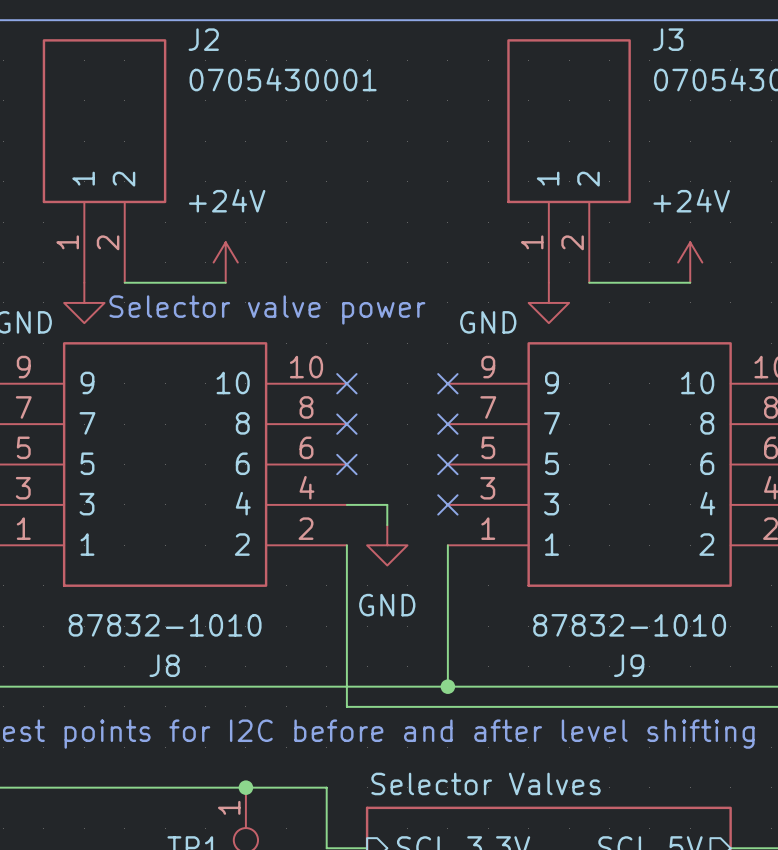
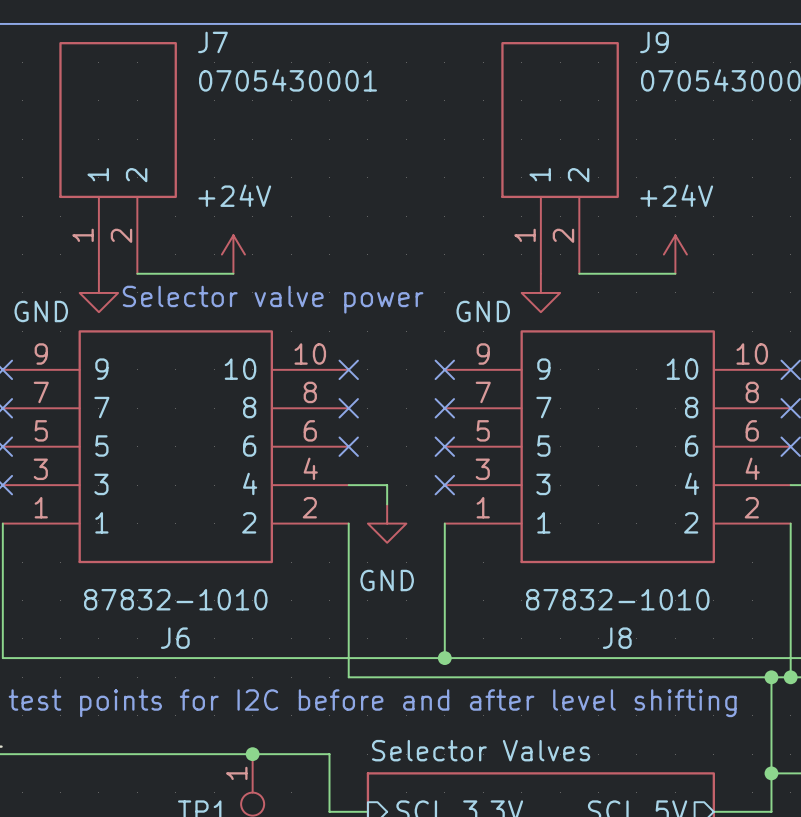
J2 name: J2 (203, 39) -> J7 (212, 42)
J3 name: J3 (668, 39) -> J9 (654, 42)
J8 name: J8 (164, 665) -> J6 (175, 638)
J9 name: J9 (629, 665) -> J8 (617, 638)

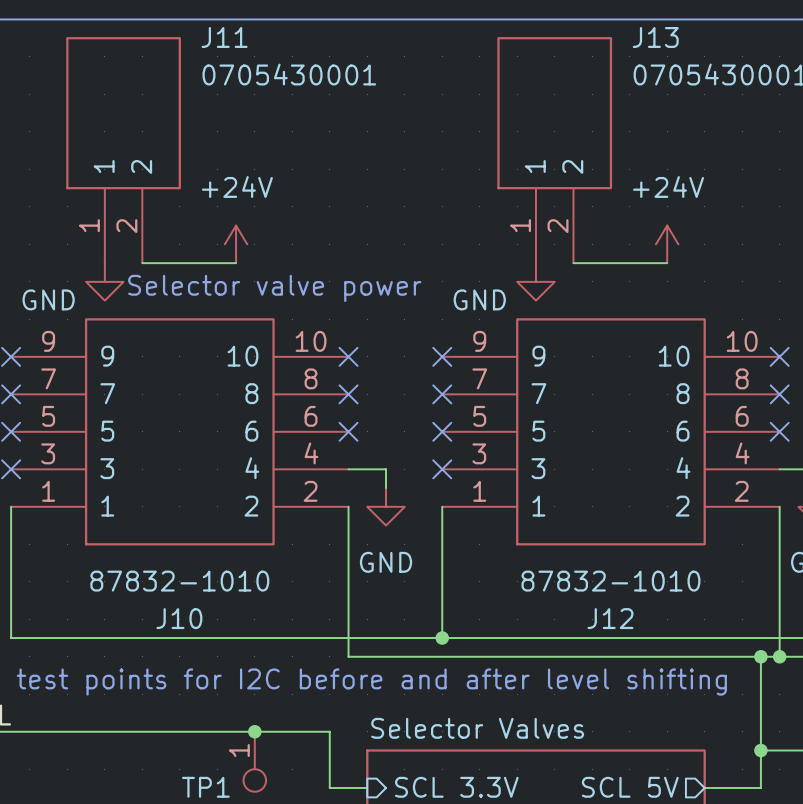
J7 name: J7 (212, 42) -> J11 (224, 37)
J9 name: J9 (654, 42) -> J13 (655, 37)
J6 name: J6 (175, 638) -> J10 (179, 618)
J8 name: J8 (617, 638) -> J12 (610, 618)

